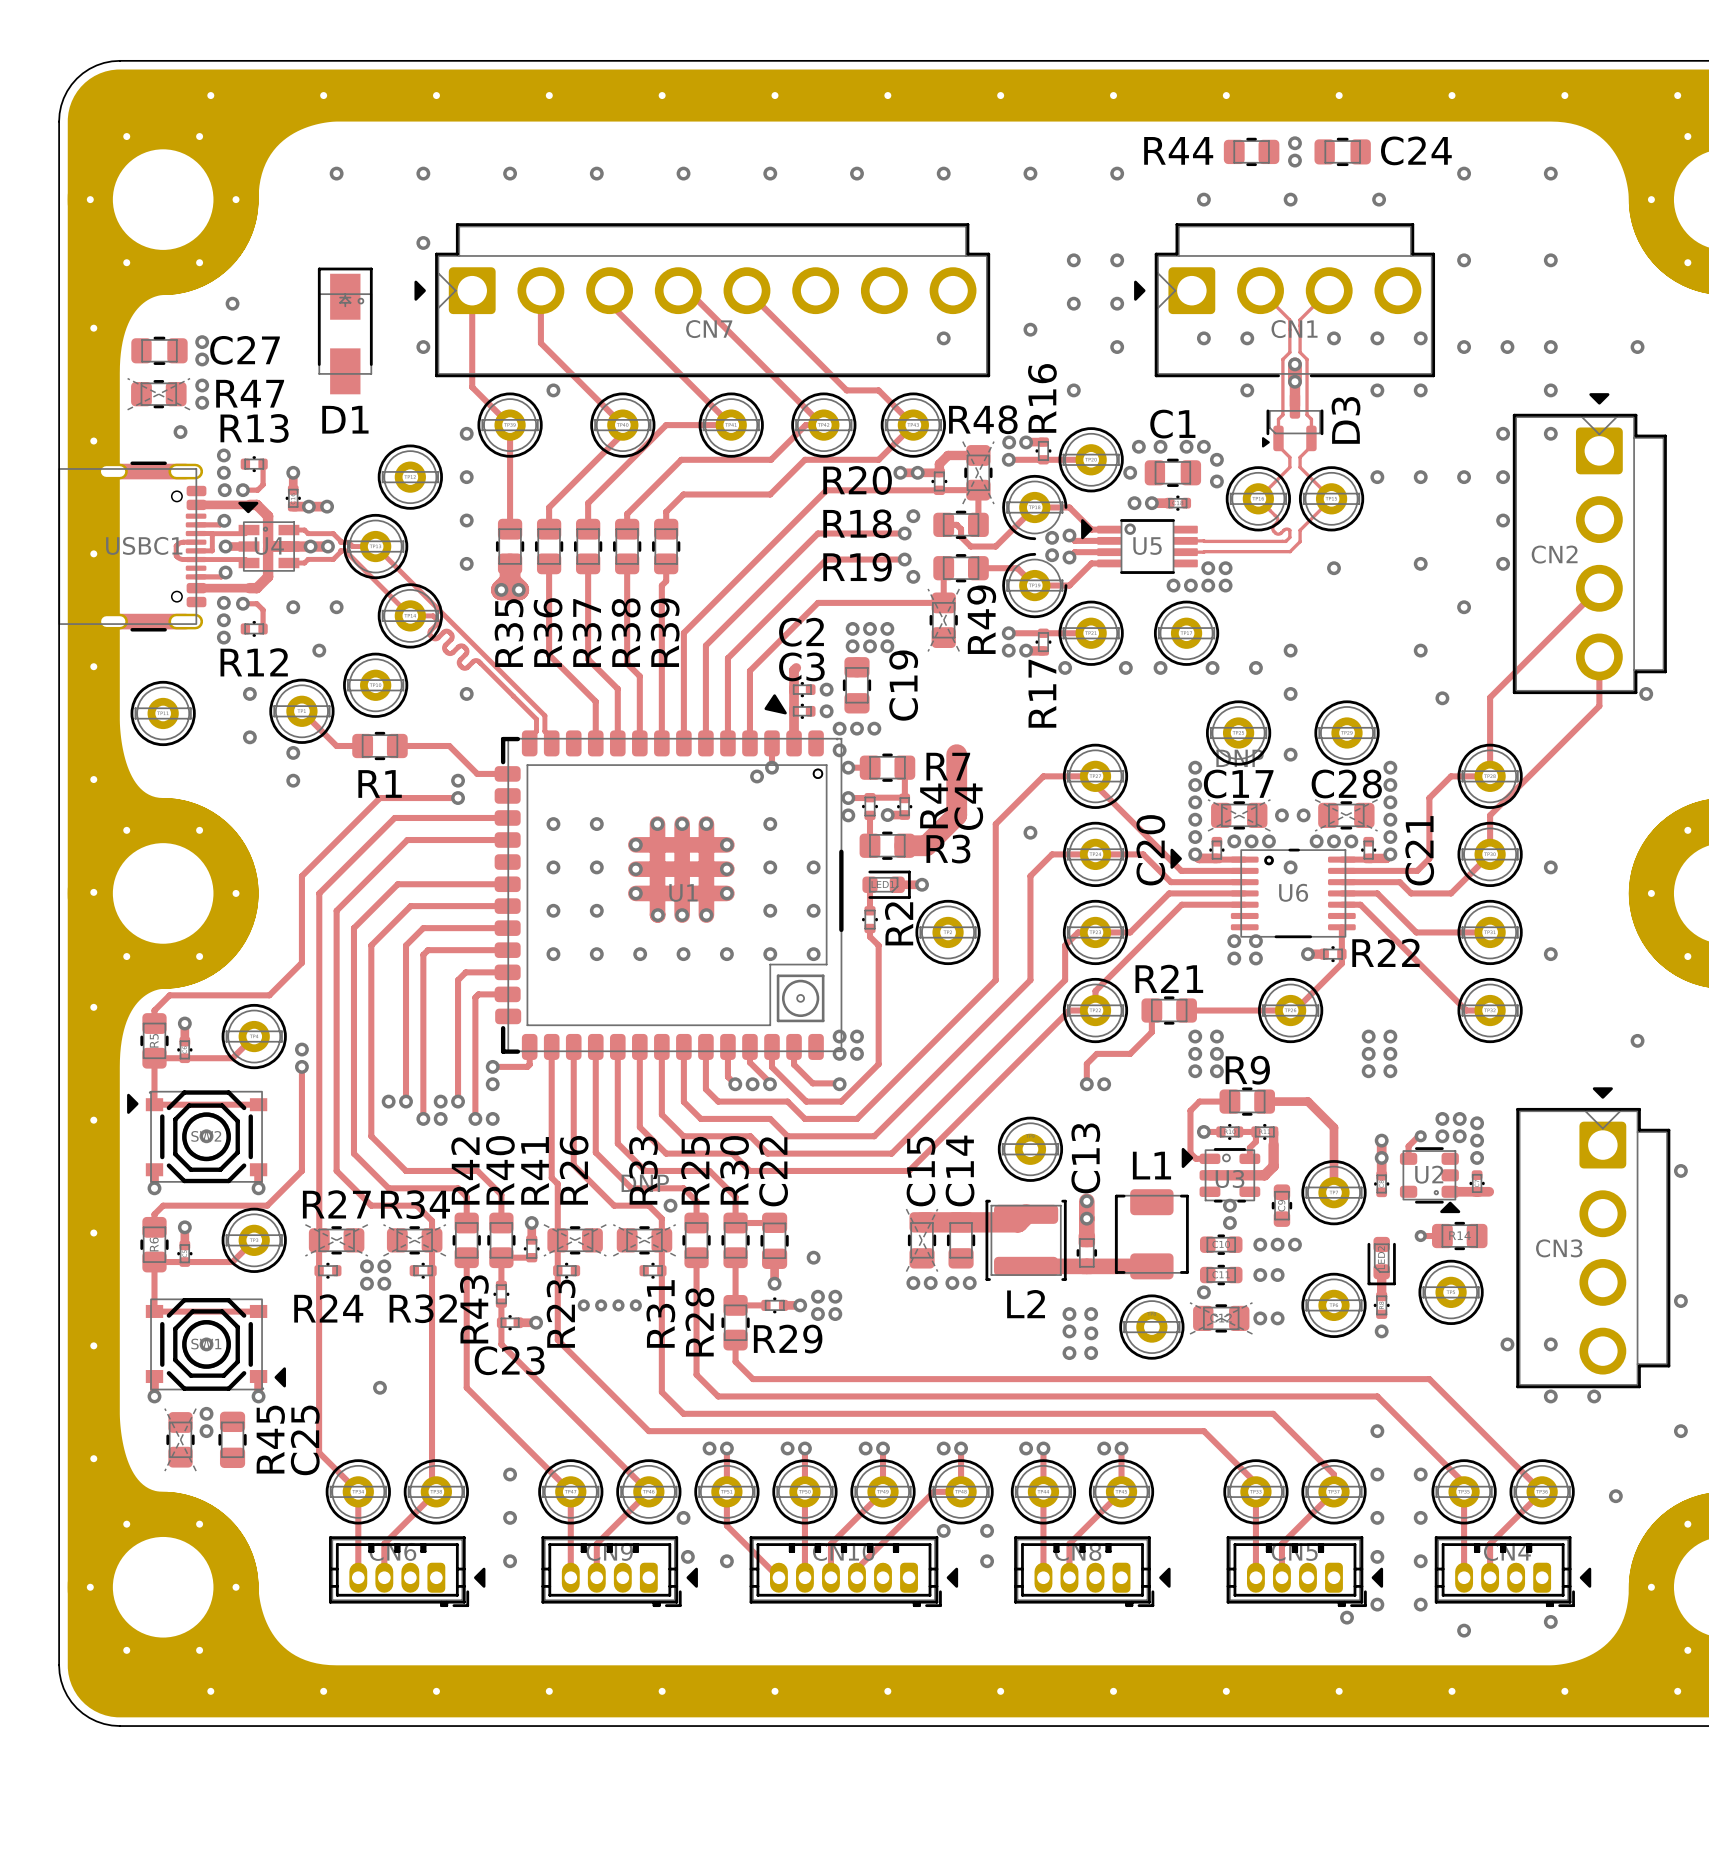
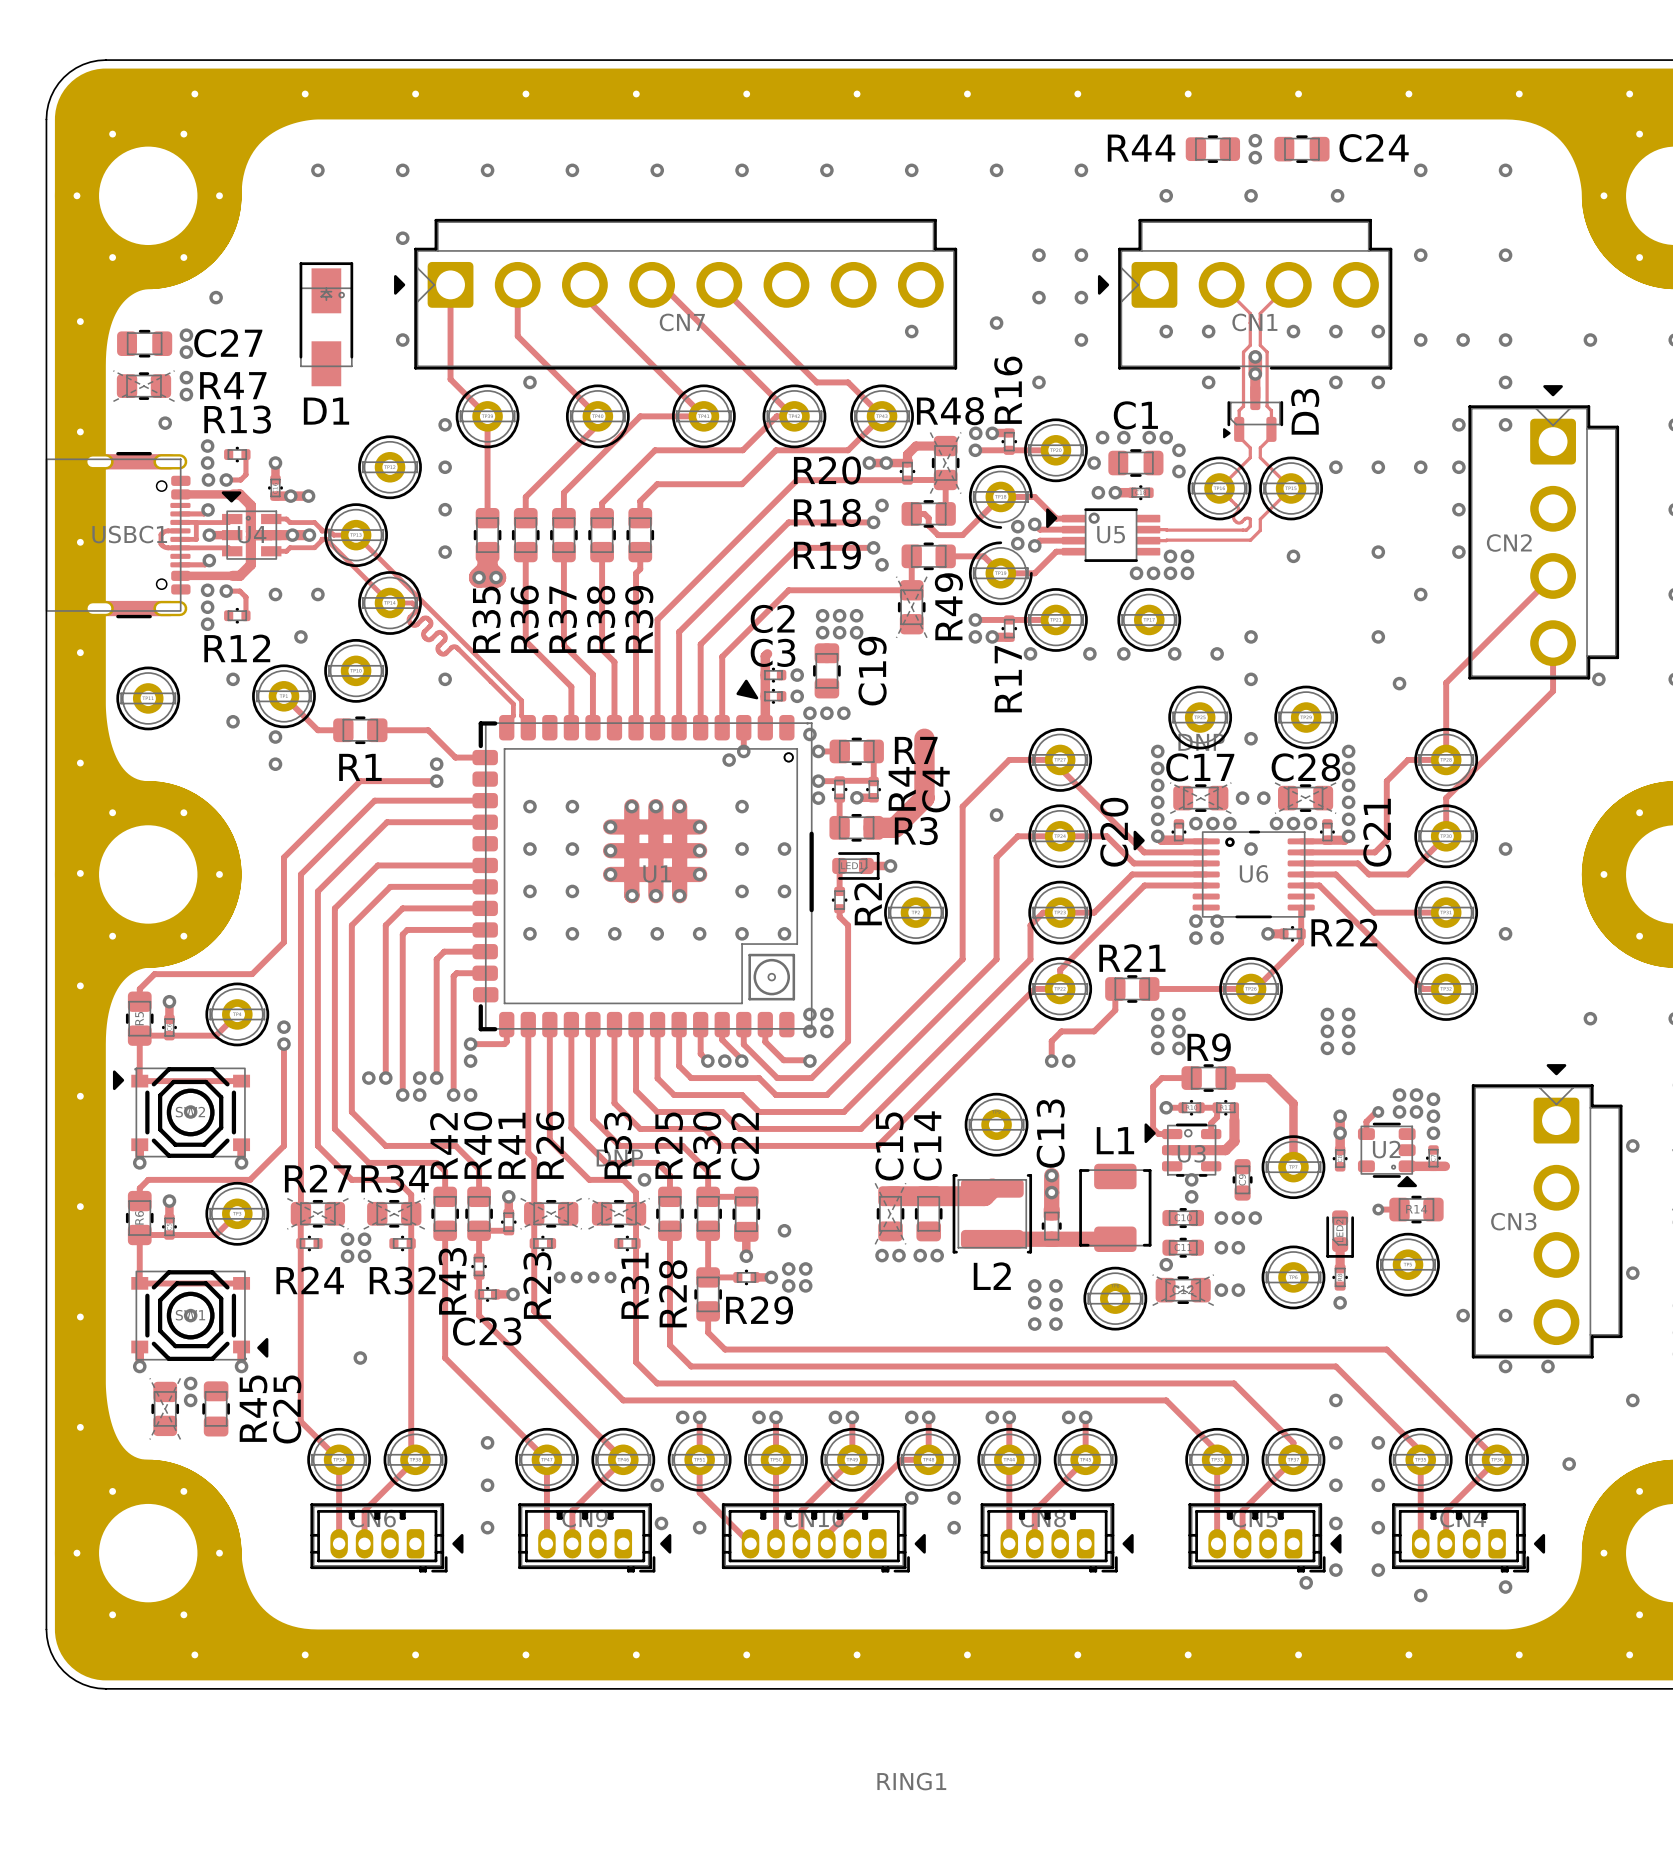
RING1 name: none -> RING1 (911, 1781)

